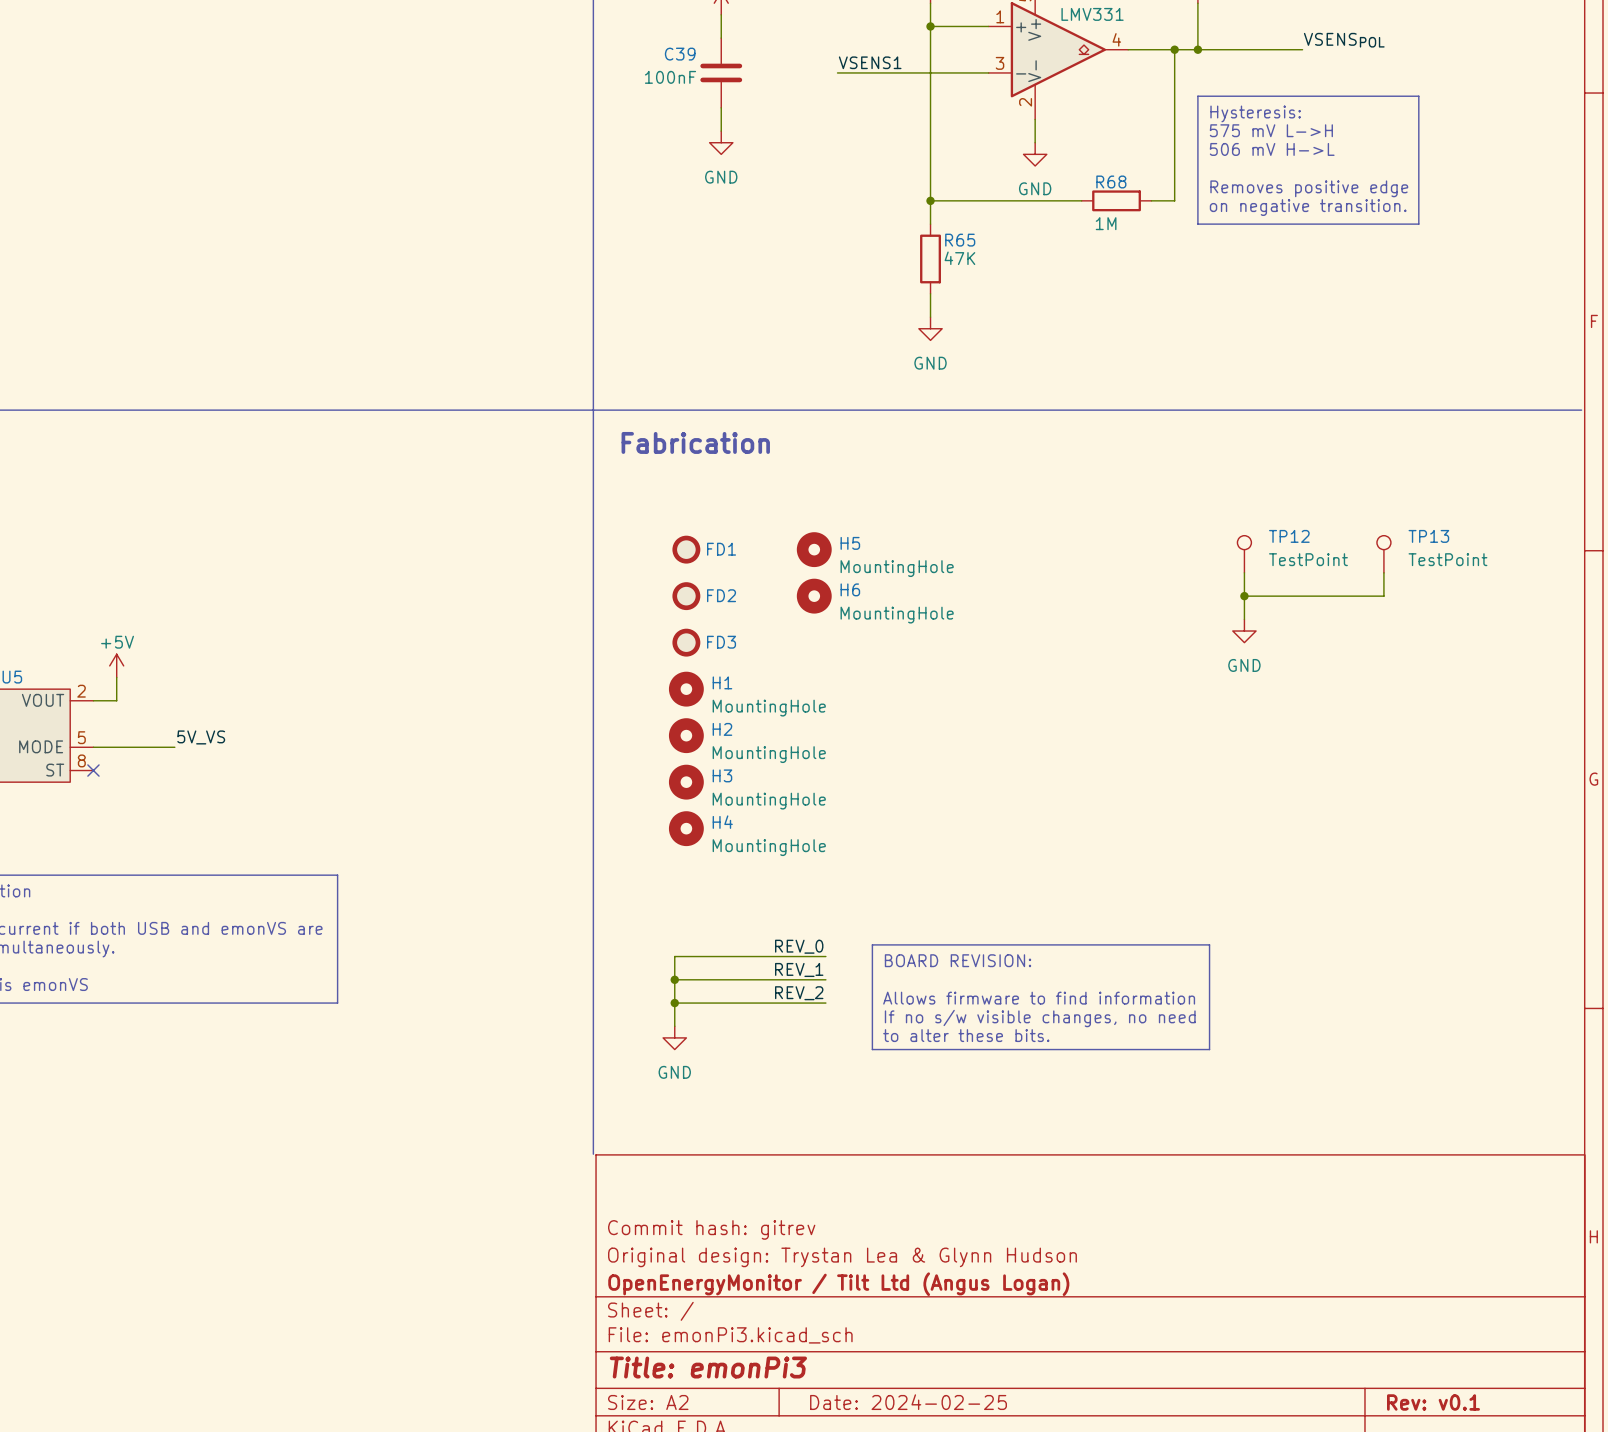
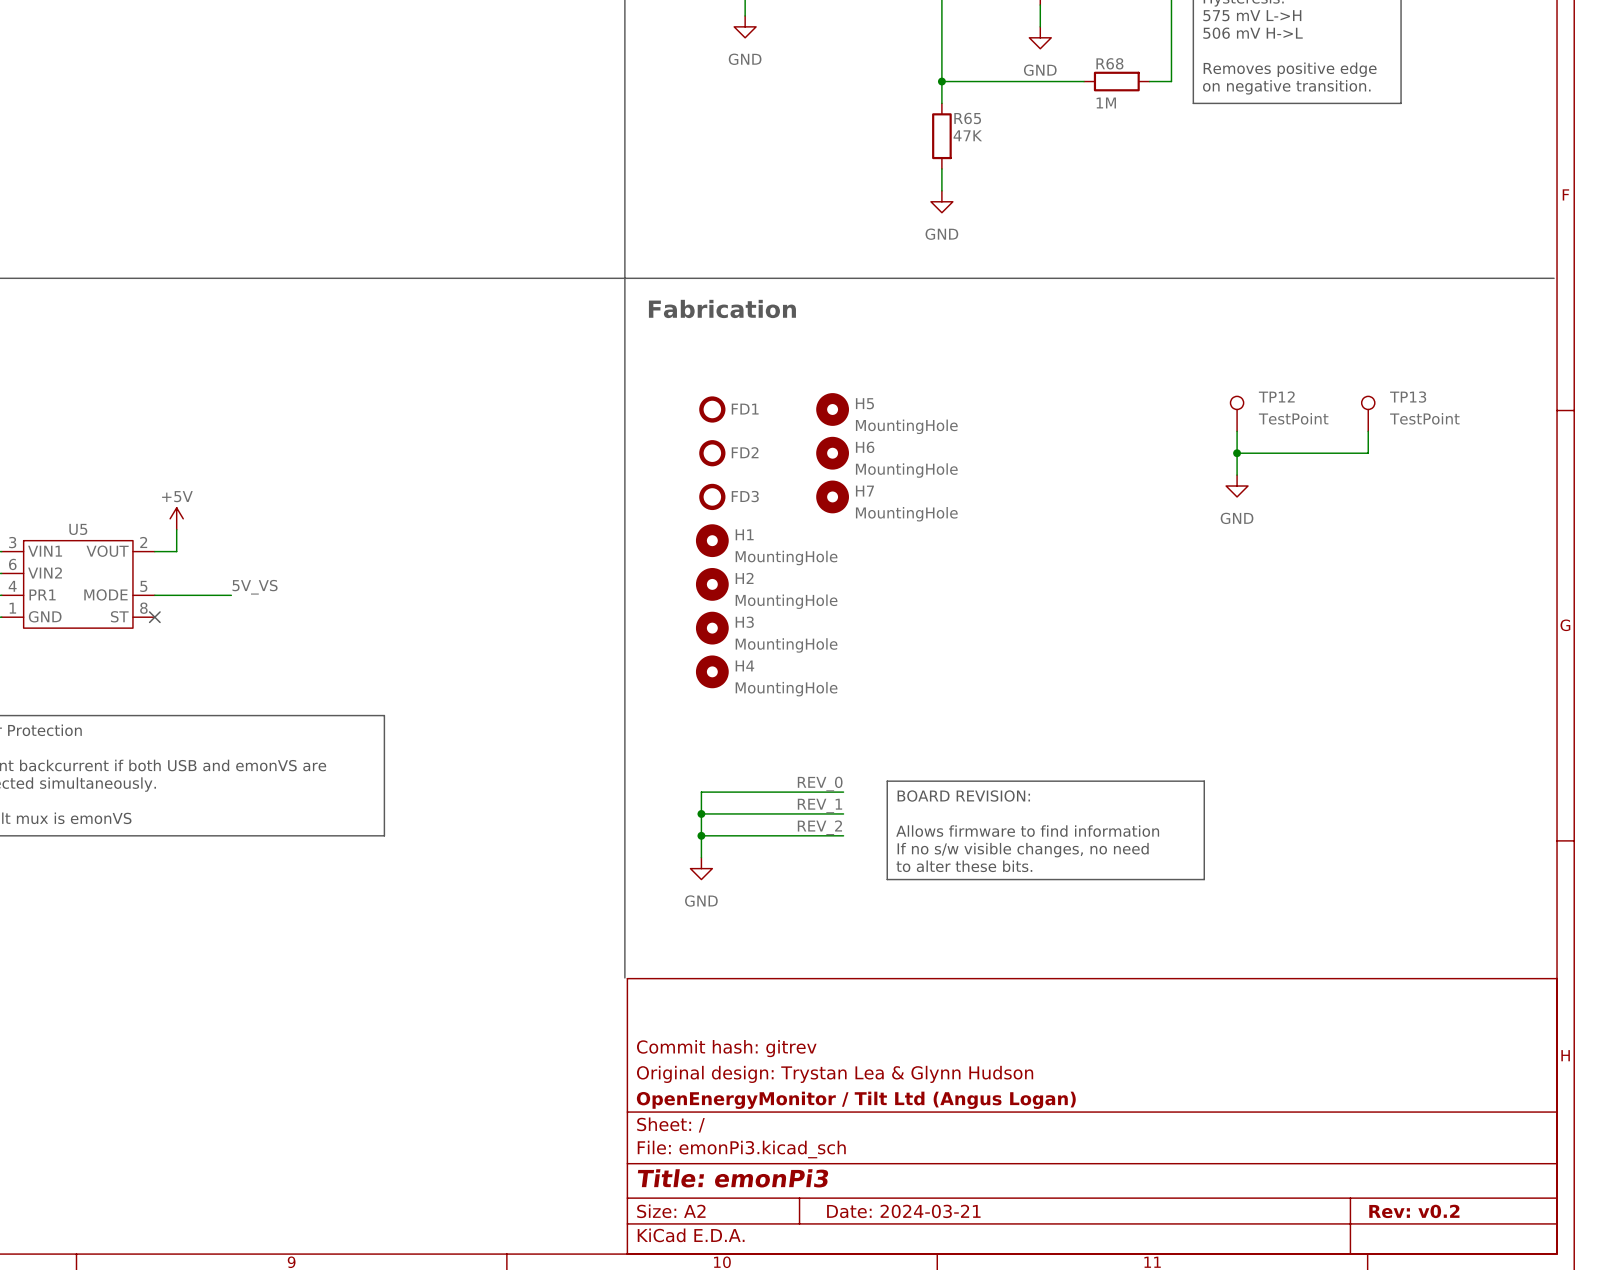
H7: none -> MountingHole (832, 496)
title block: Date: 2024-02-25 (908, 1402) -> Date: 2024-03-21 (903, 1211)
title block: Rev: v0.1 (1433, 1402) -> Rev: v0.2 (1414, 1211)

